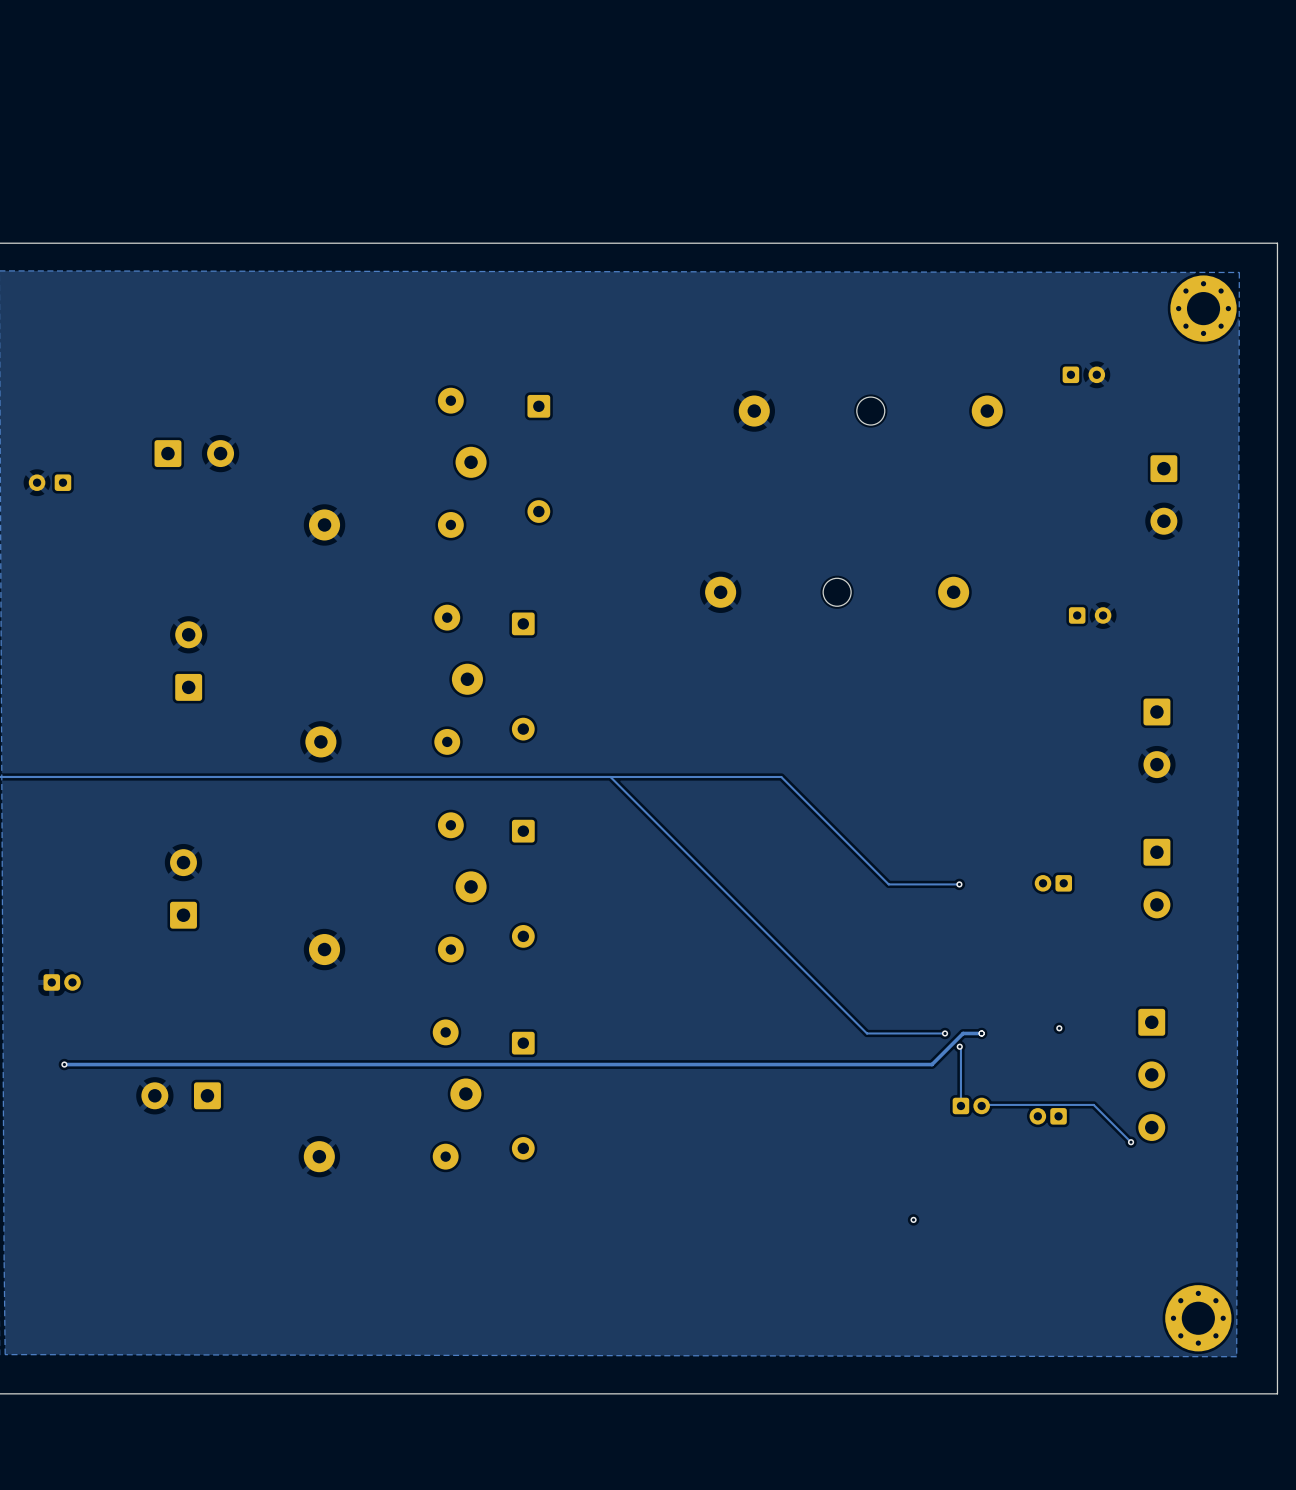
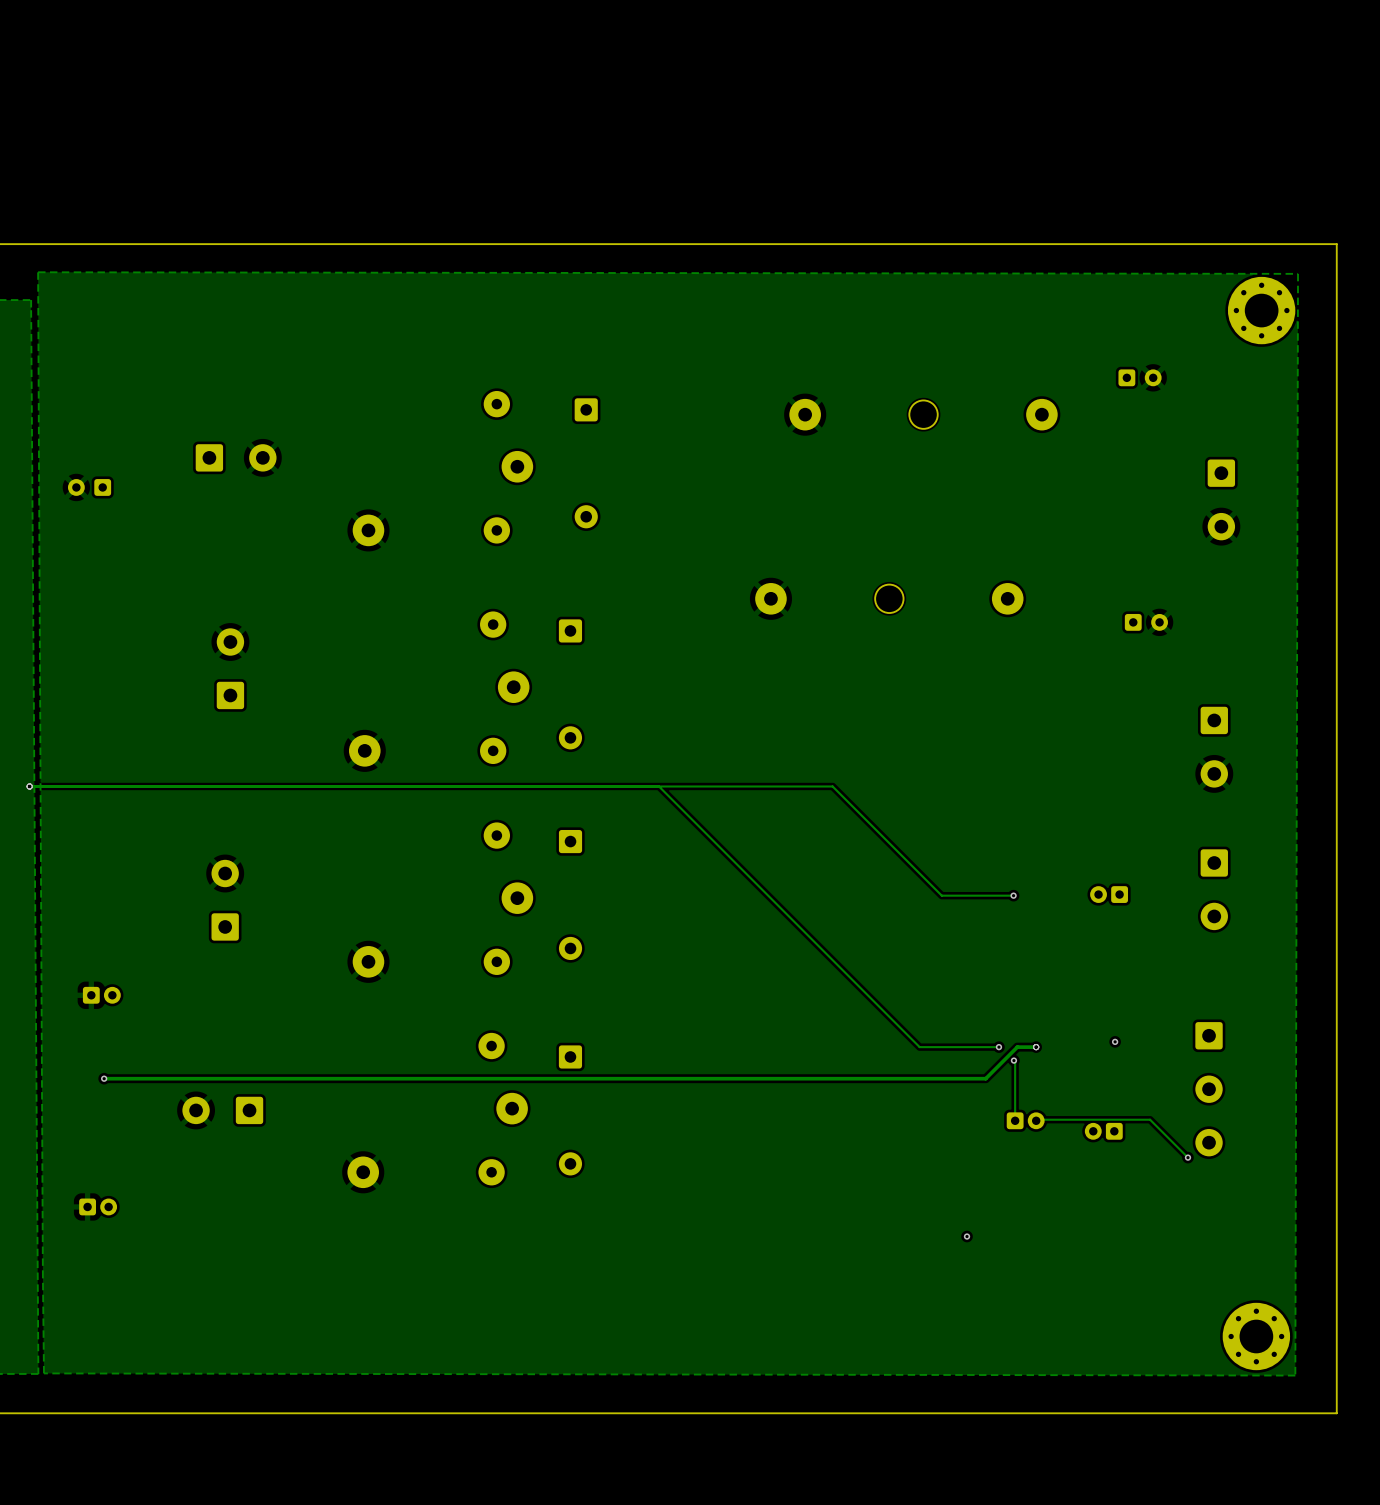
part: none -> (98, 1206)

